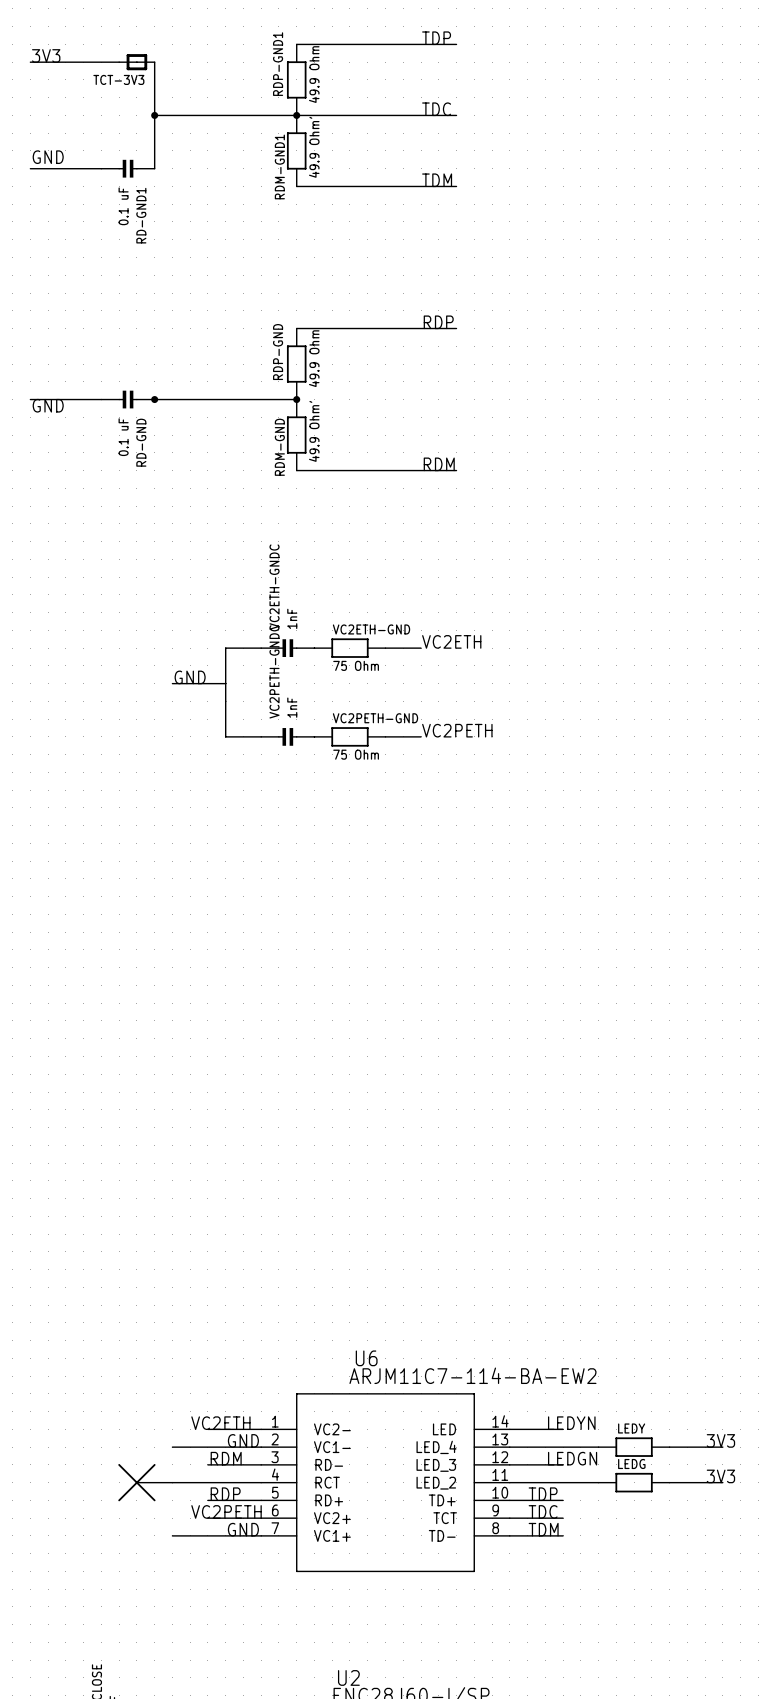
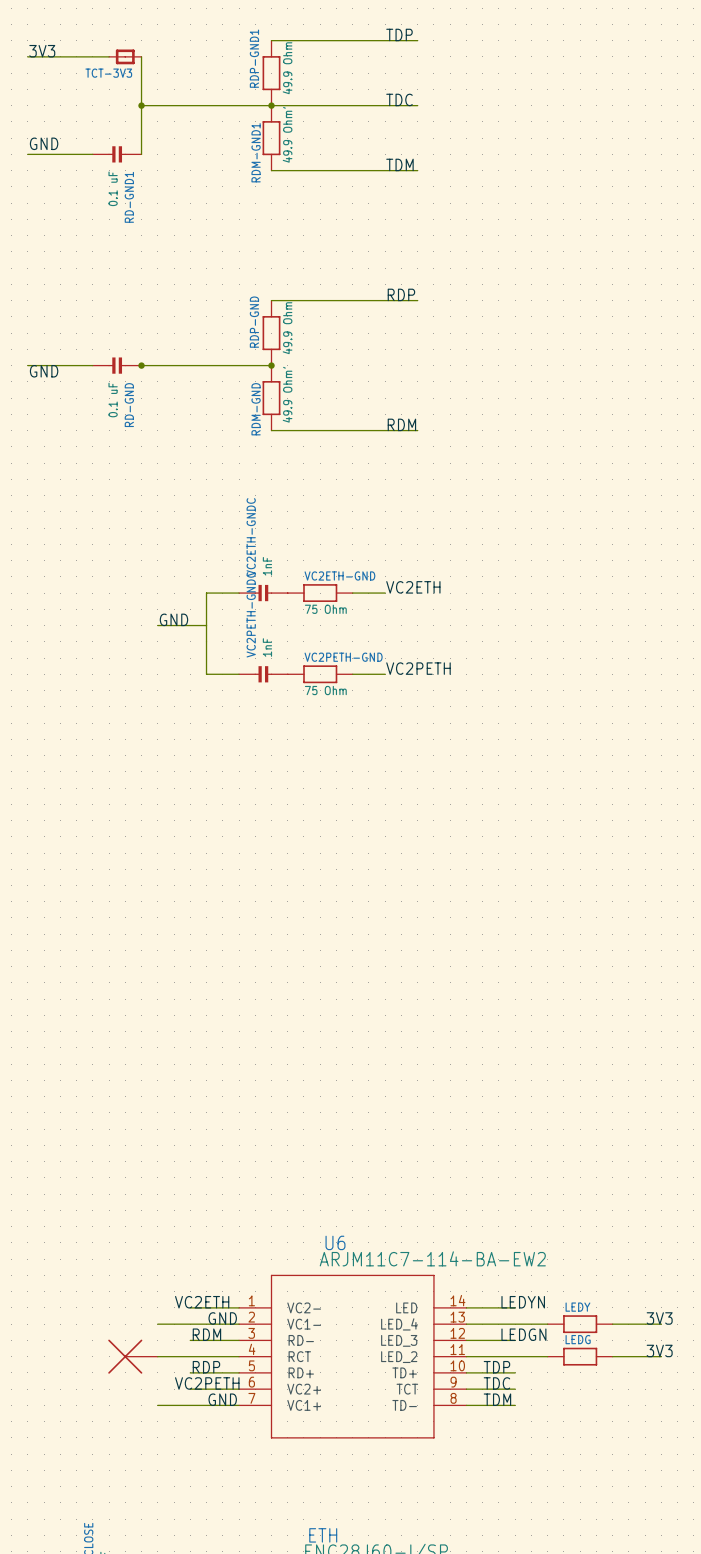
U2 name: U2 (348, 1677) -> ETH (323, 1535)

